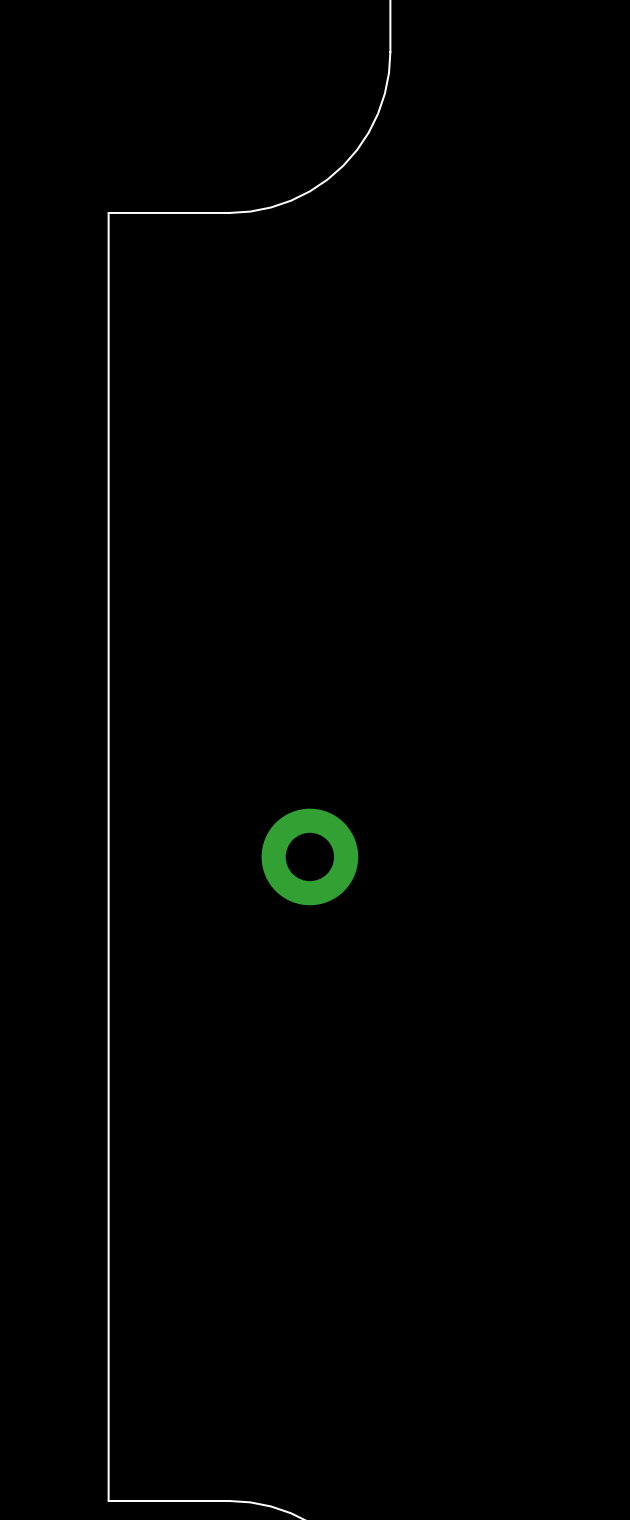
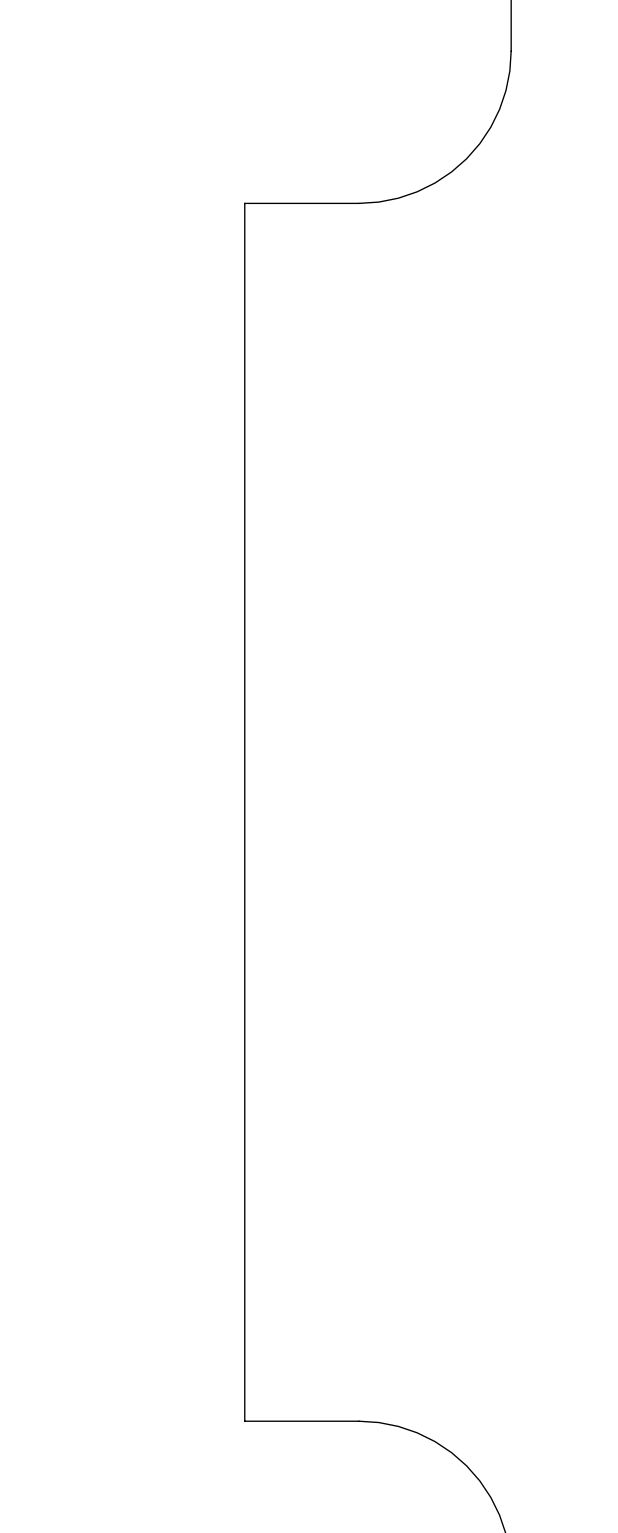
via: (309, 856) -> none

